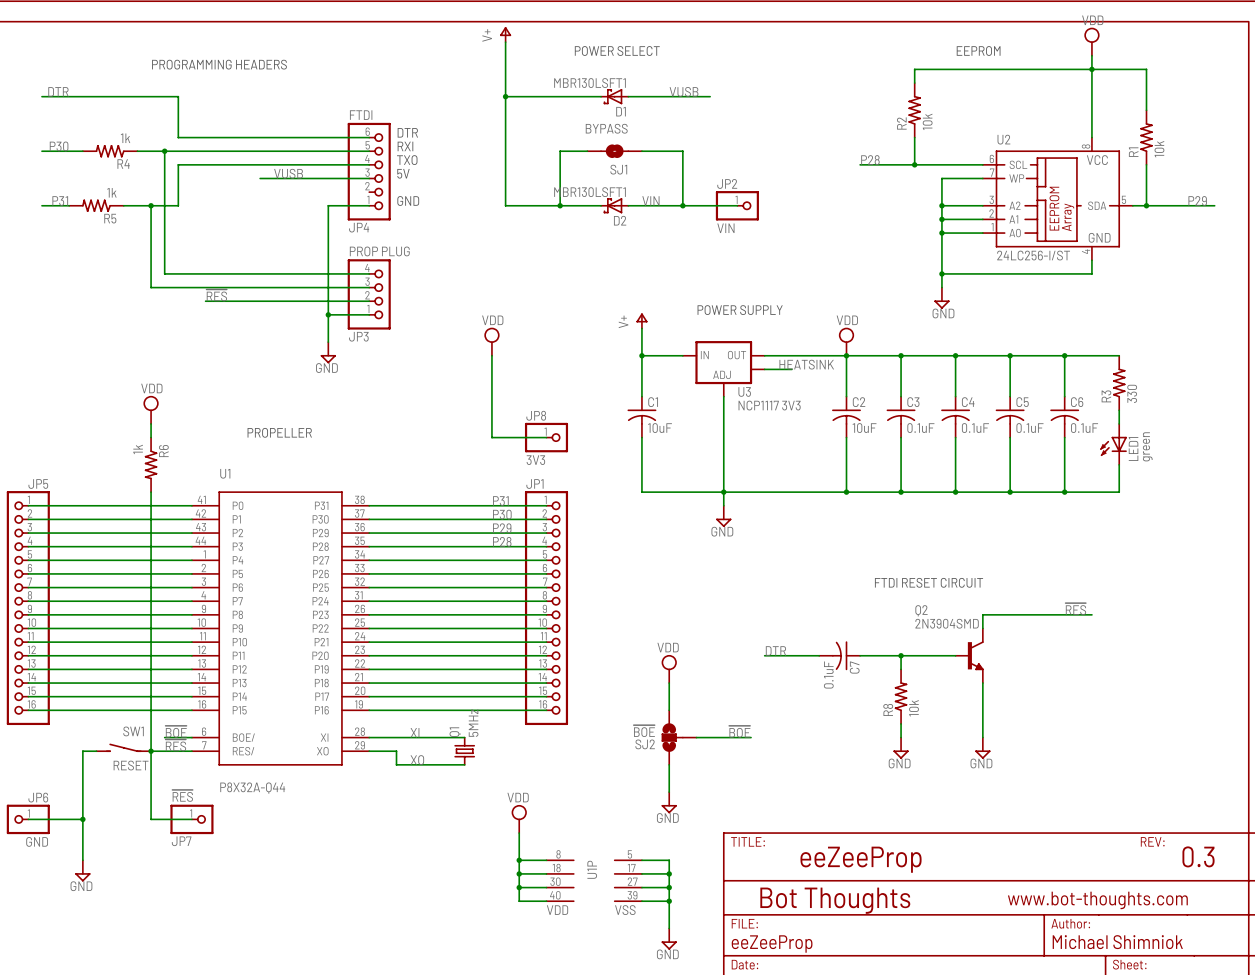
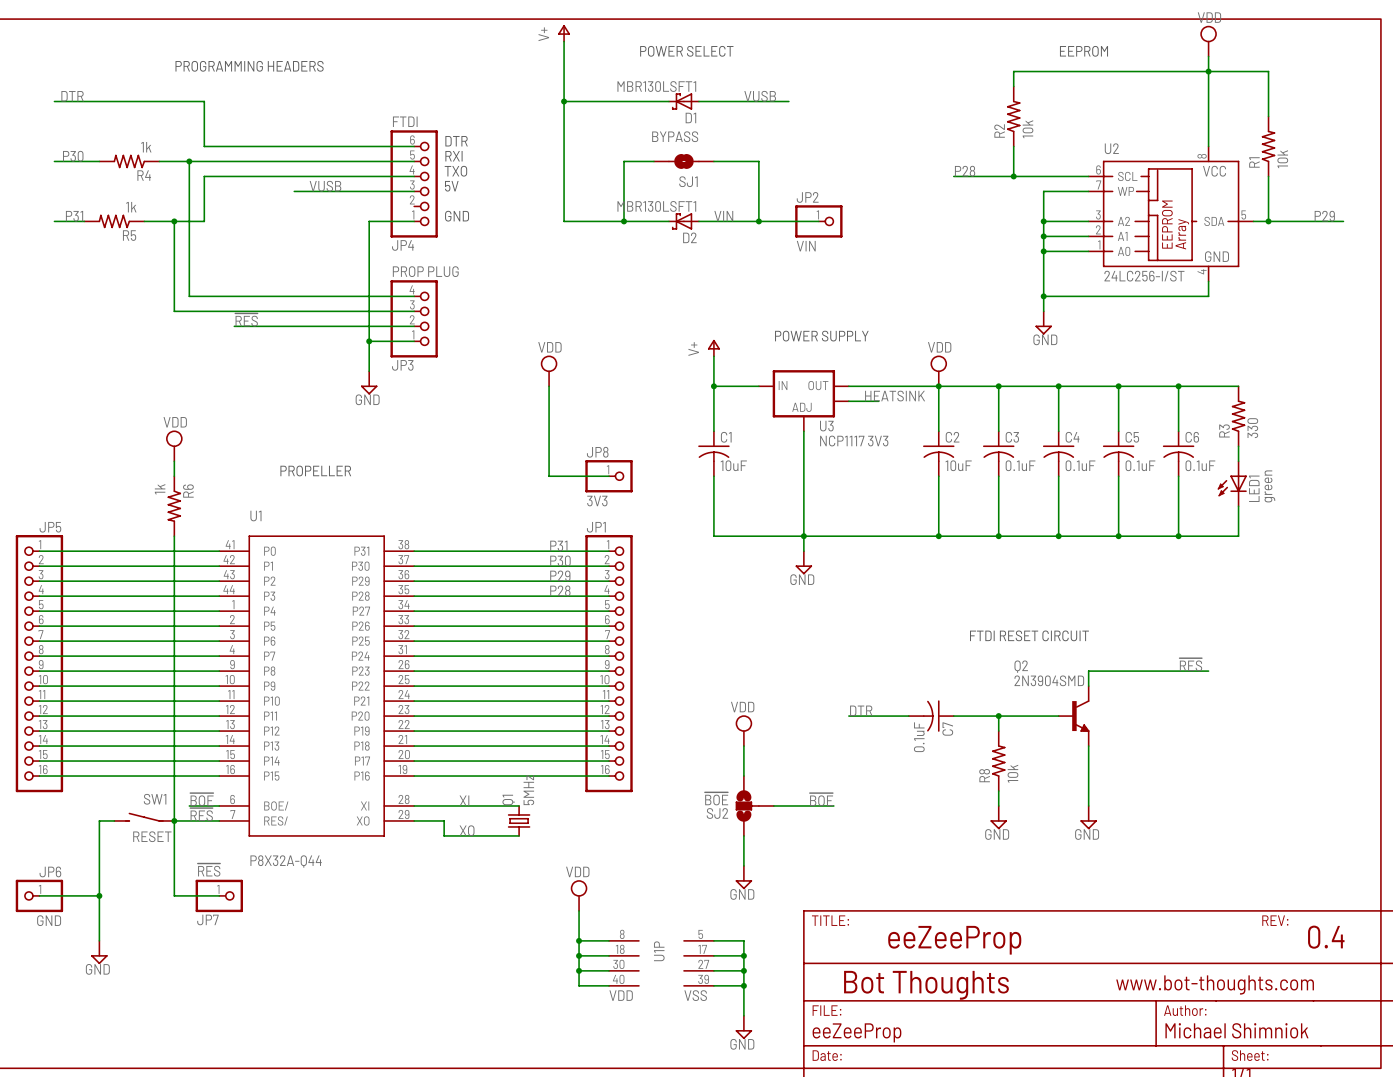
text: 0.3 (1198, 856) -> 0.4 (1326, 937)

